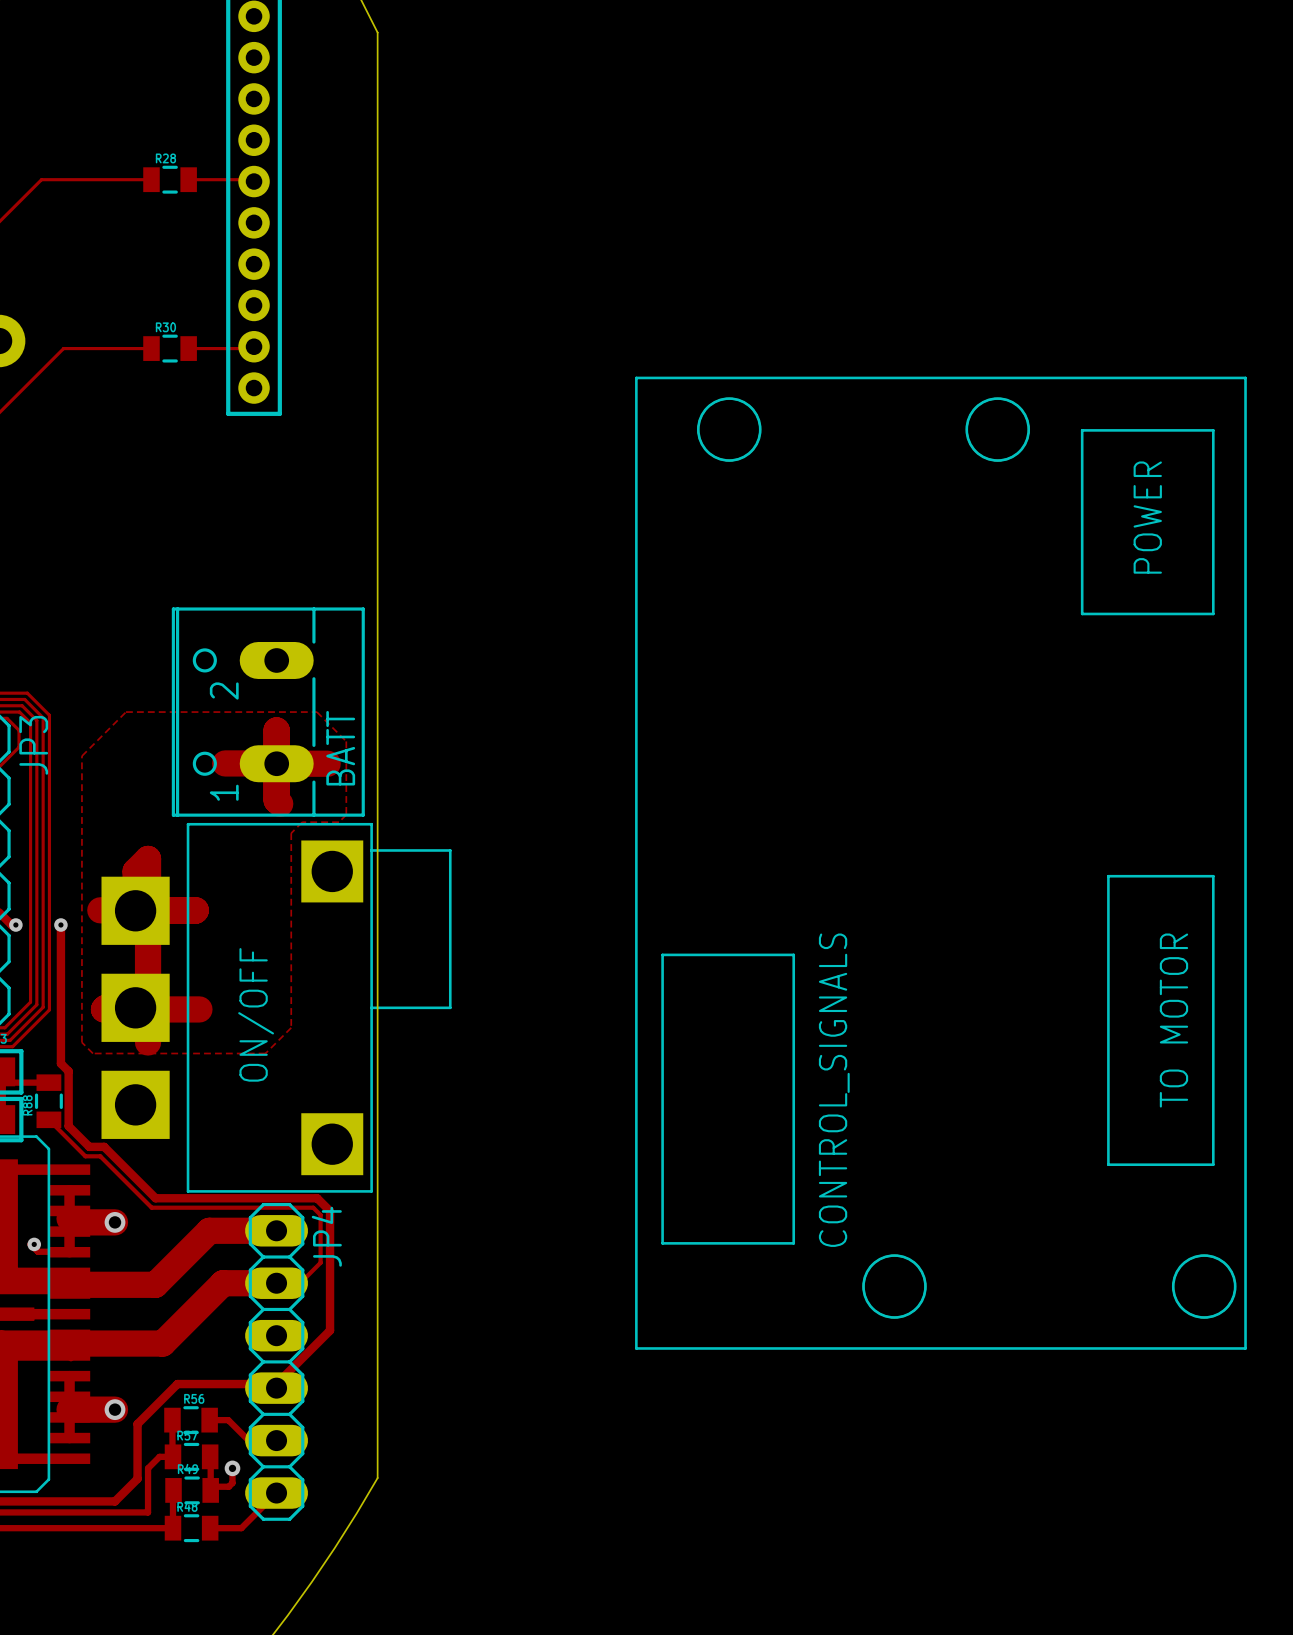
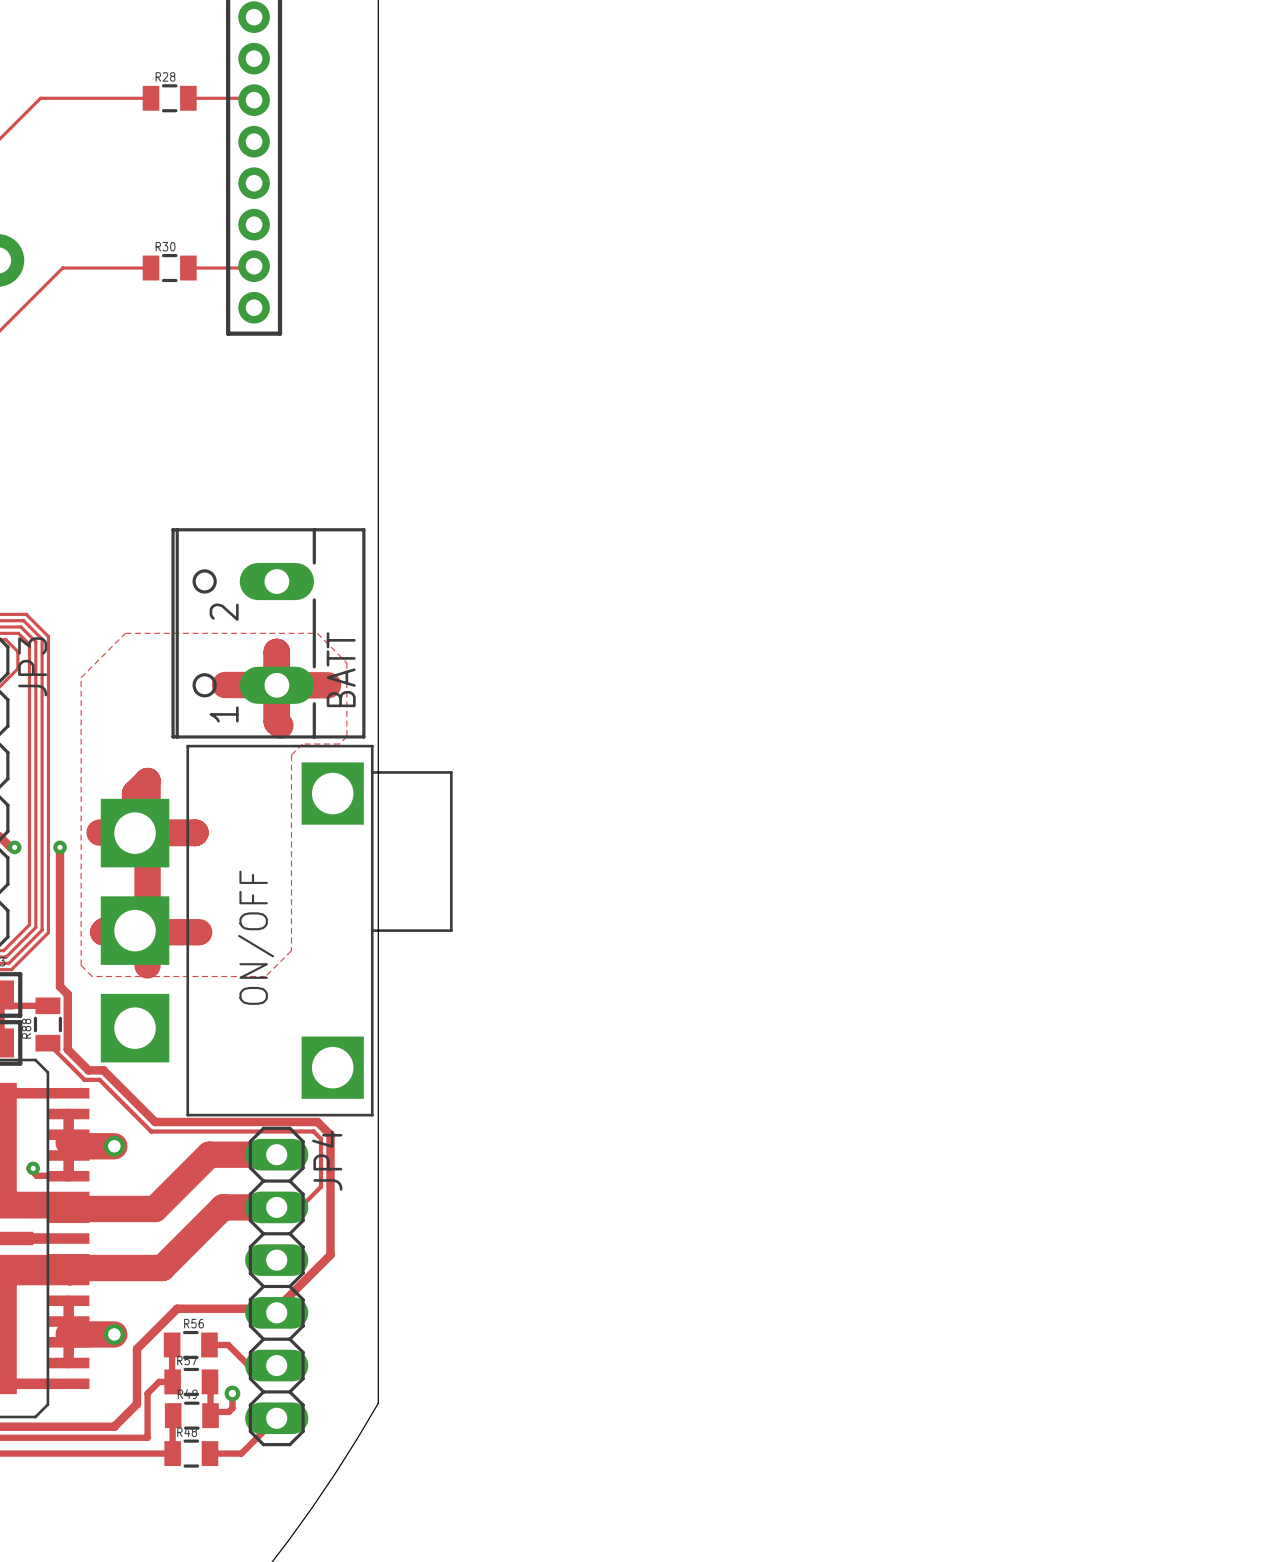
part: (940, 863) -> none

